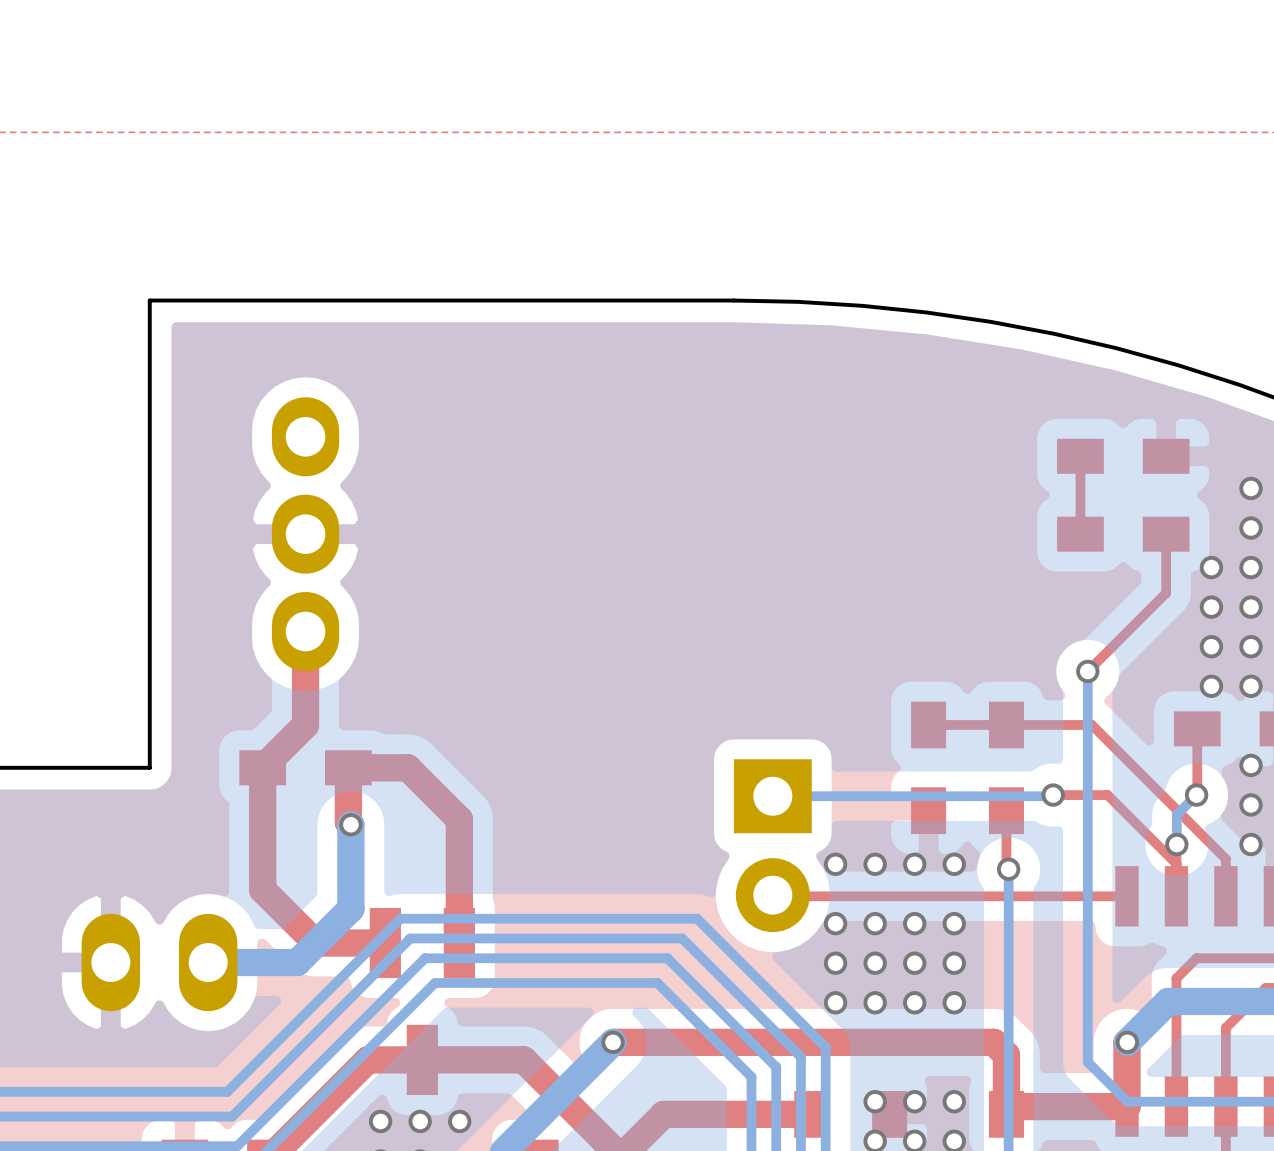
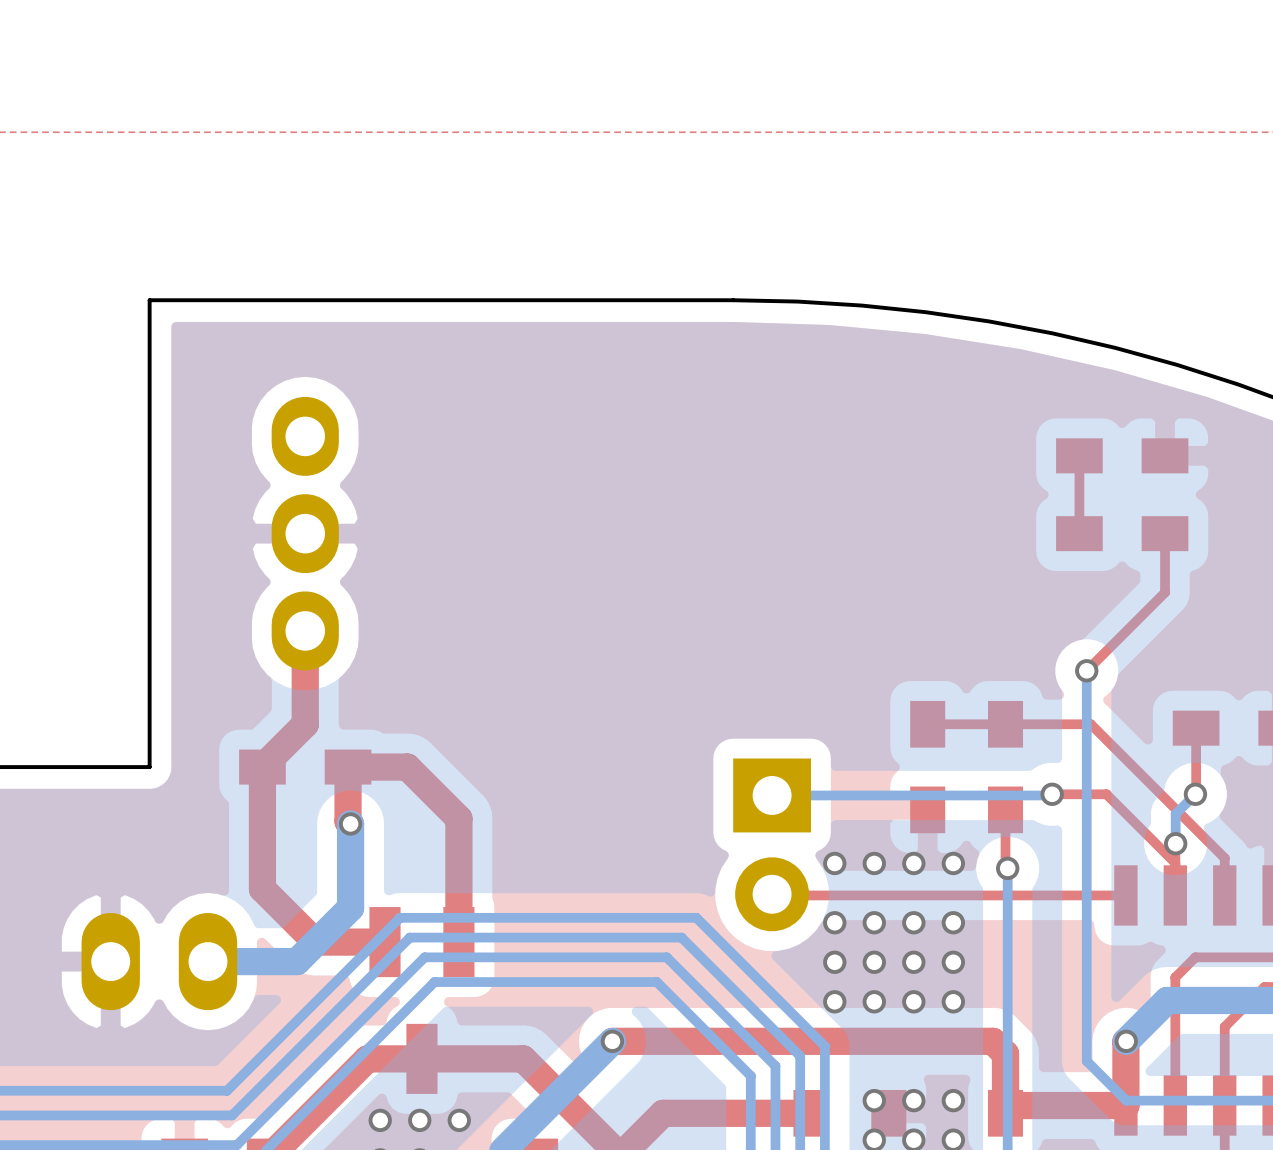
via: (1251, 488) -> none
via: (1251, 528) -> none
via: (1211, 567) -> none
via: (1251, 567) -> none
via: (1211, 607) -> none
via: (1251, 607) -> none
via: (1211, 646) -> none
via: (1251, 646) -> none
via: (1211, 686) -> none
via: (1251, 686) -> none
via: (1251, 765) -> none
via: (1251, 804) -> none
via: (1251, 844) -> none

